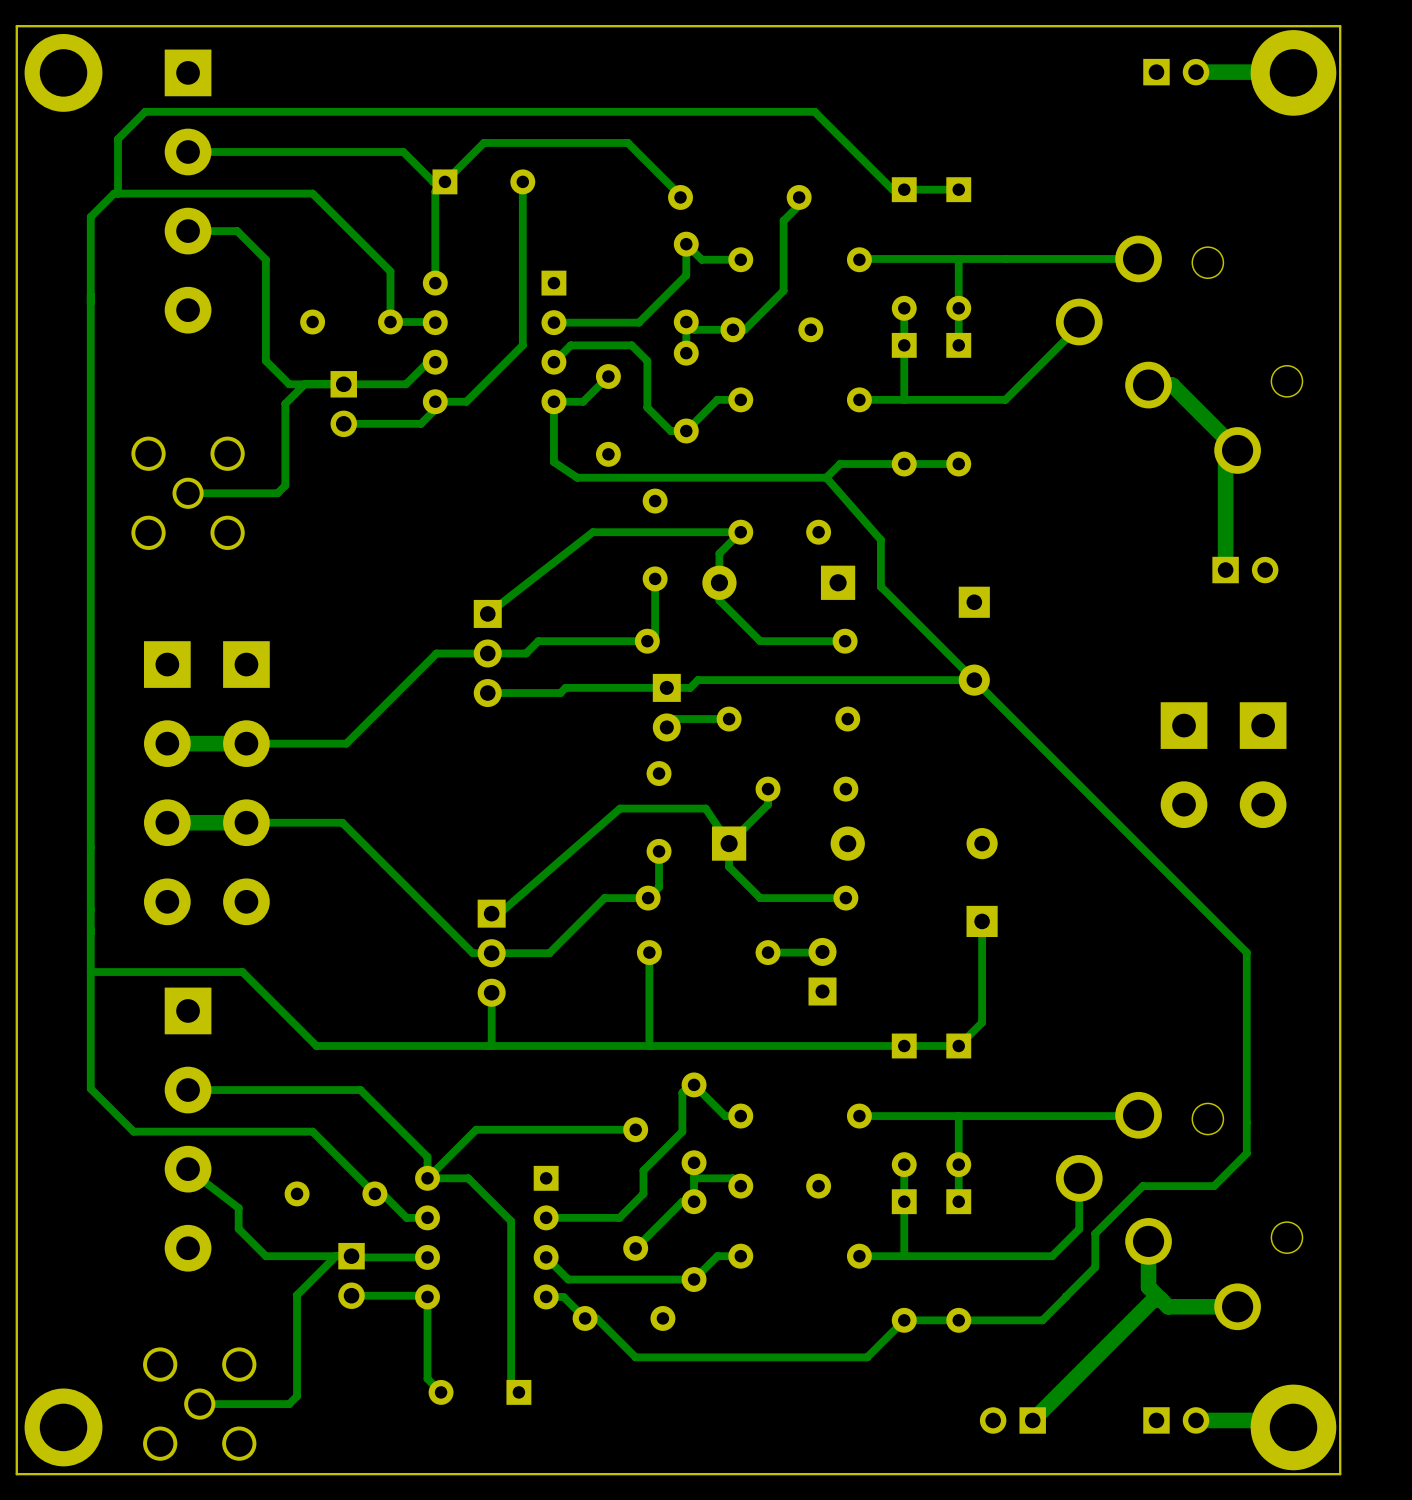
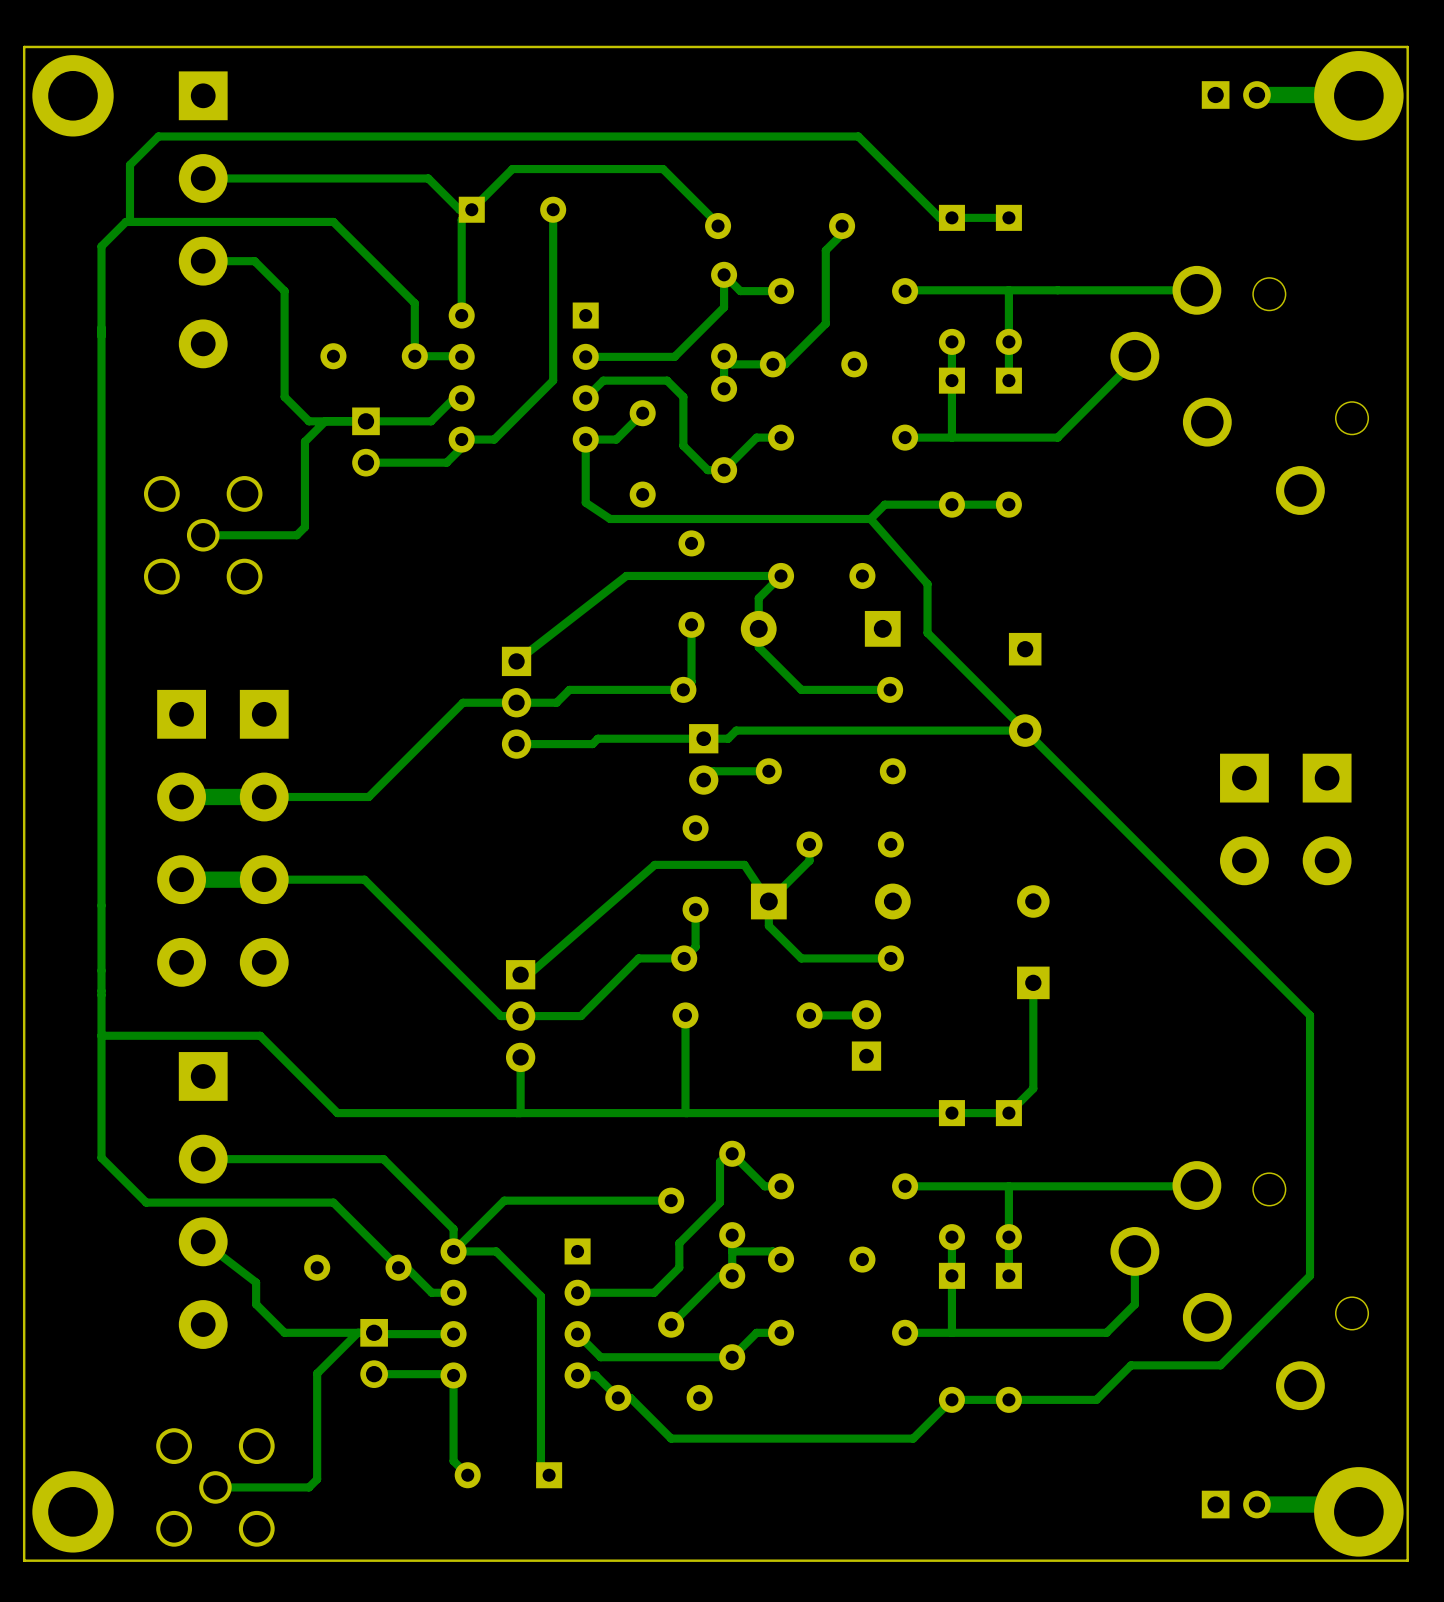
track: (1148, 385) (1172, 385) (1237, 450) (1225, 463) (1225, 570) -> none
part: (1245, 570) -> none
track: (1246, 1153) (1214, 1186) (1142, 1186) (1095, 1233) (1095, 1267) (1065, 1296) -> (1310, 1225) (1310, 1275) (1220, 1365) (1130, 1365) (1120, 1375)
track: (1148, 1241) (1148, 1287) (1168, 1306) (1237, 1306) -> none
track: (1161, 1299) (1153, 1299) (1032, 1420) -> none
part: (1012, 1420) -> none

